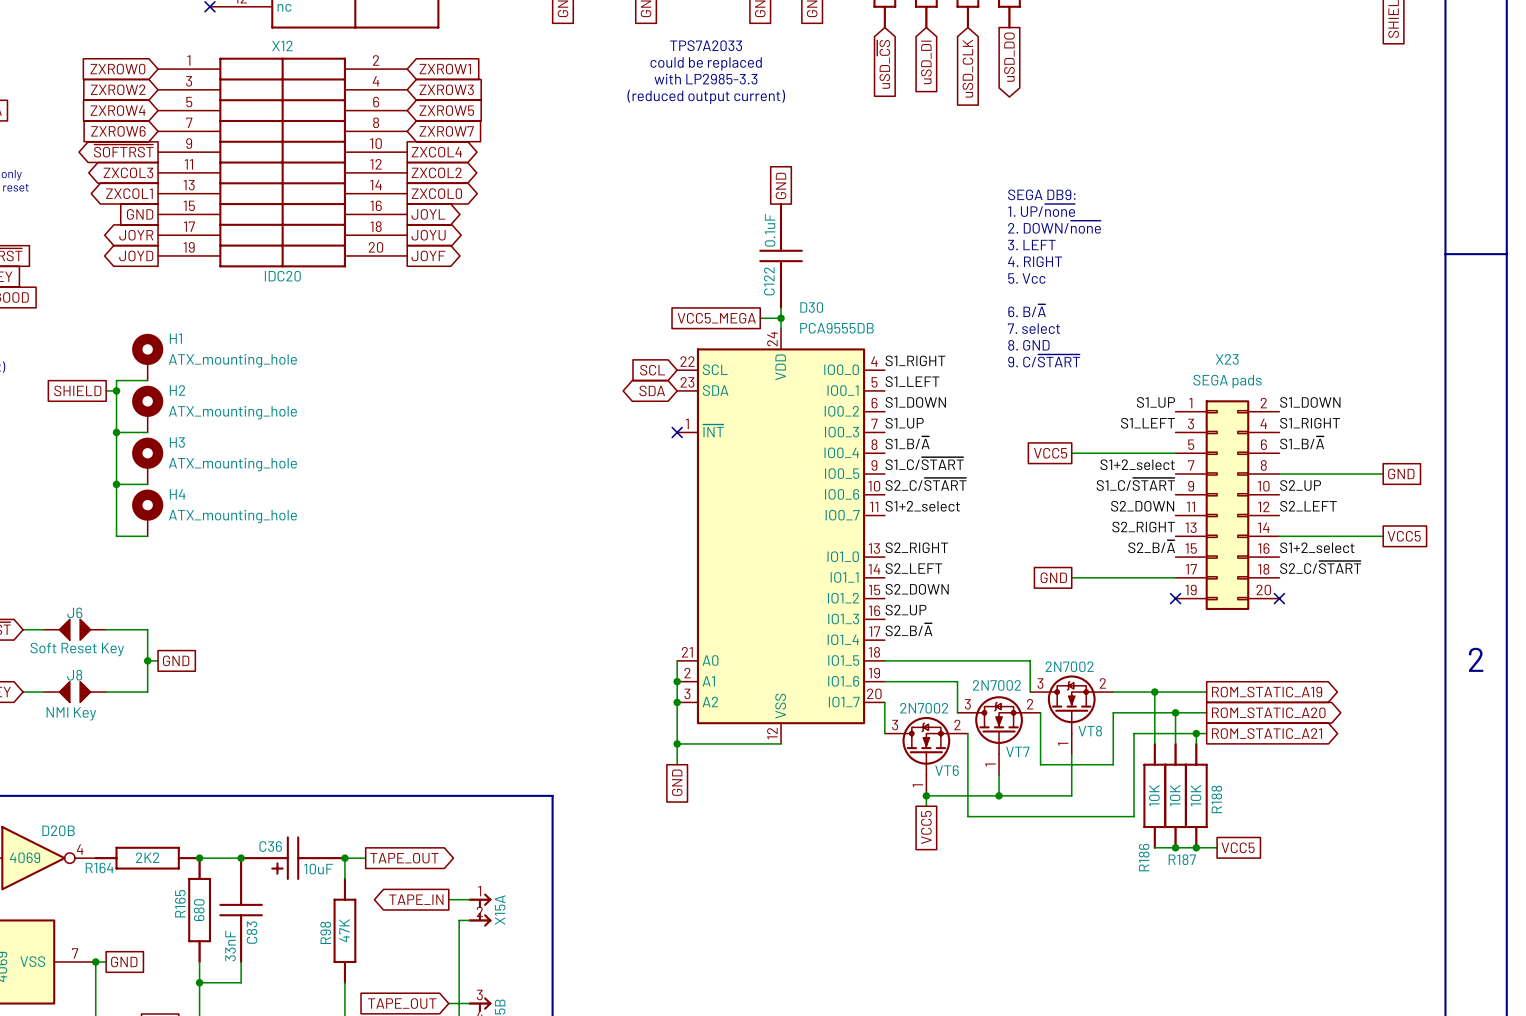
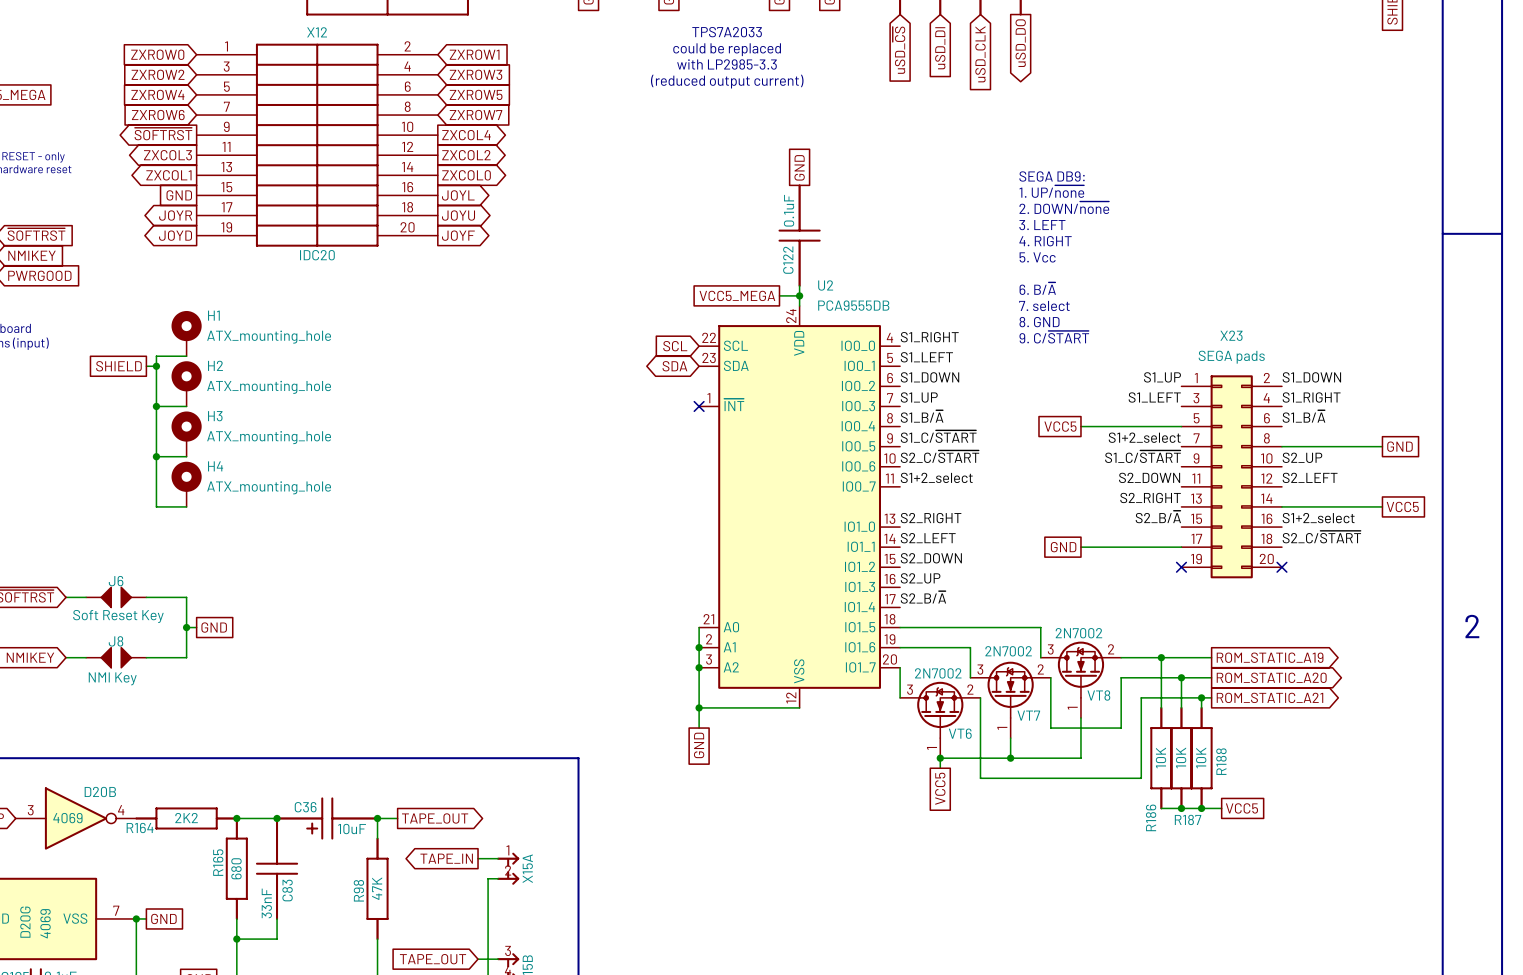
D30 name: D30 (811, 307) -> U2 (825, 285)

